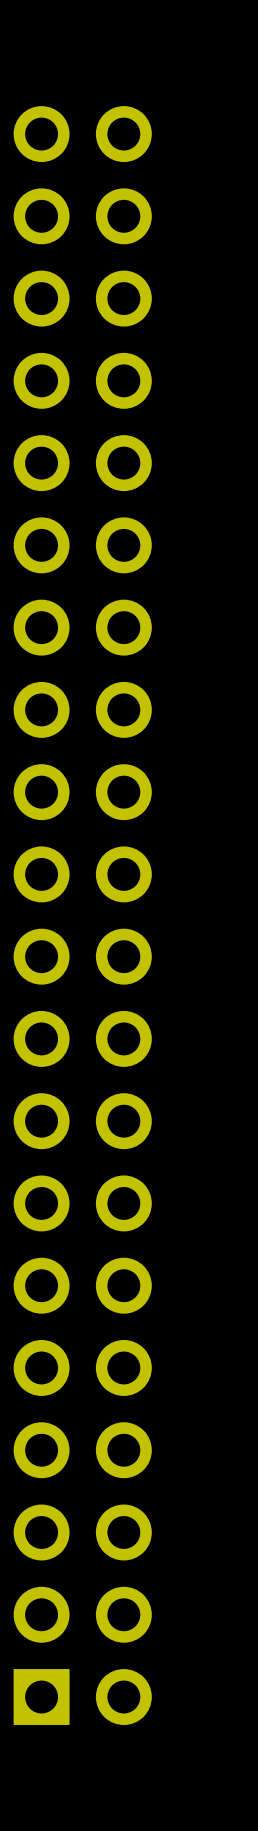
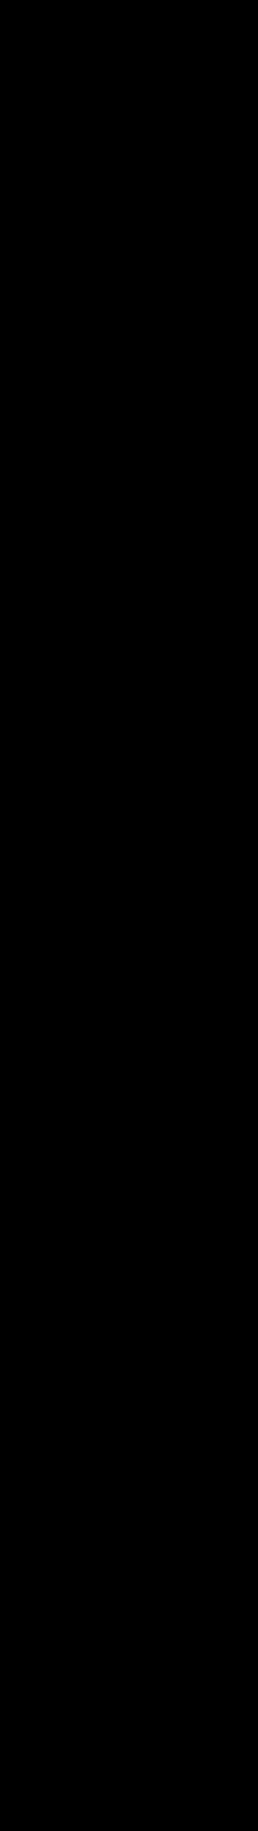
part: (82, 915) -> none

